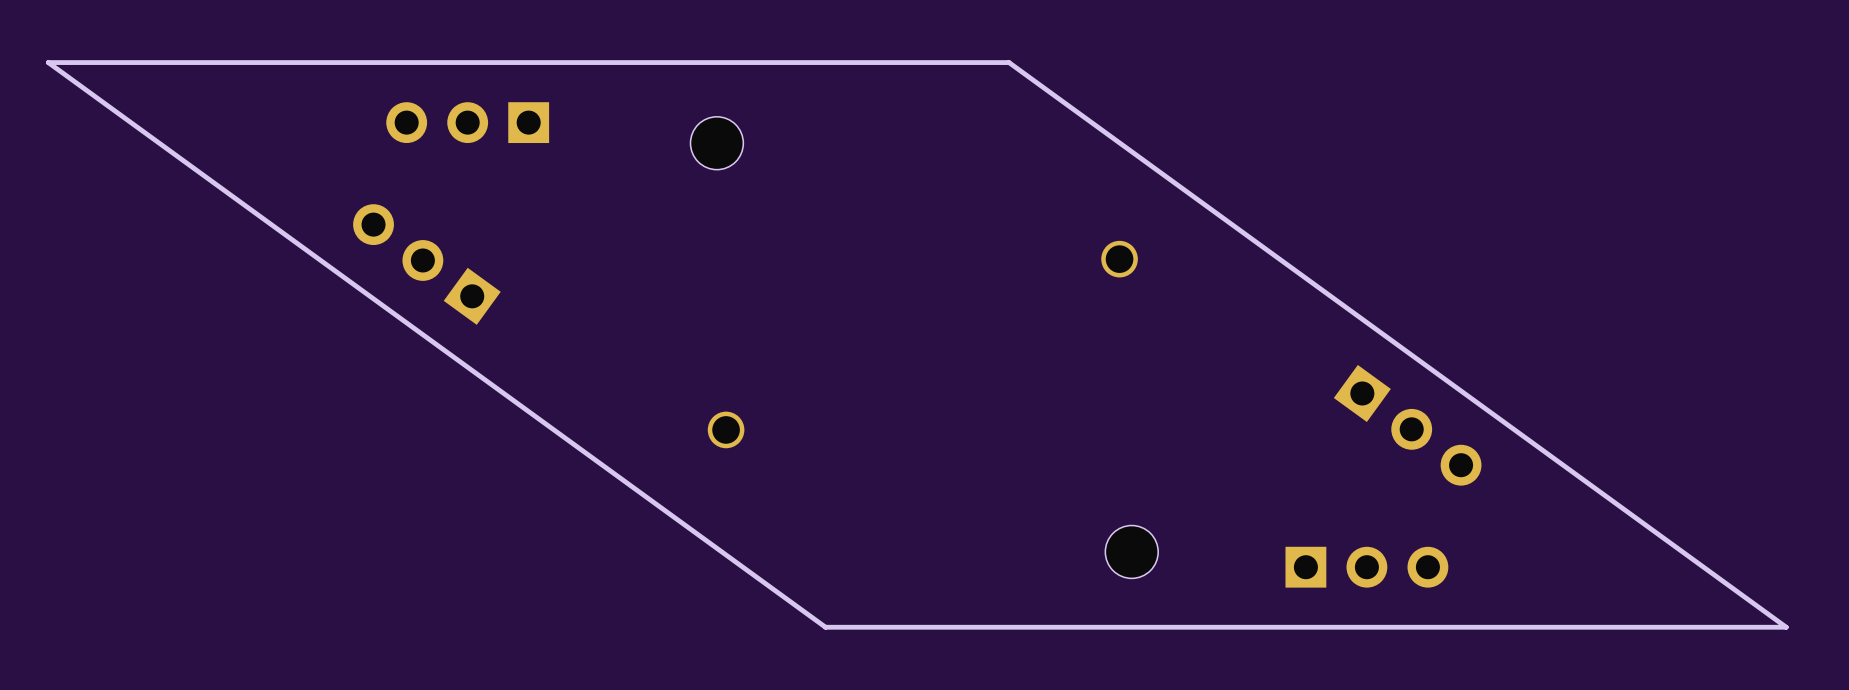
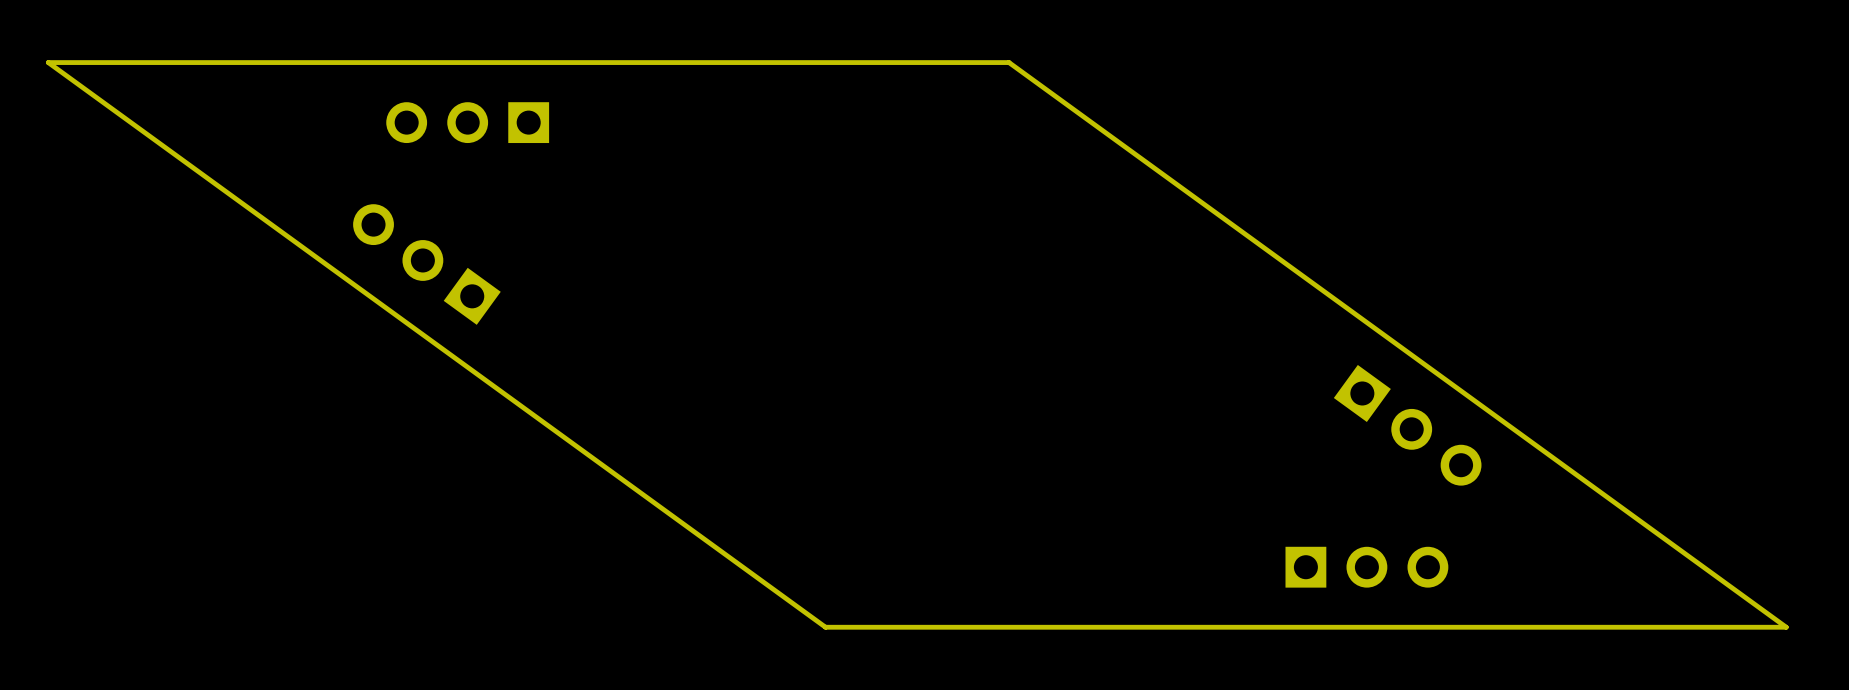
part: (716, 143) -> none
part: (1119, 259) -> none
part: (726, 429) -> none
part: (1131, 551) -> none

